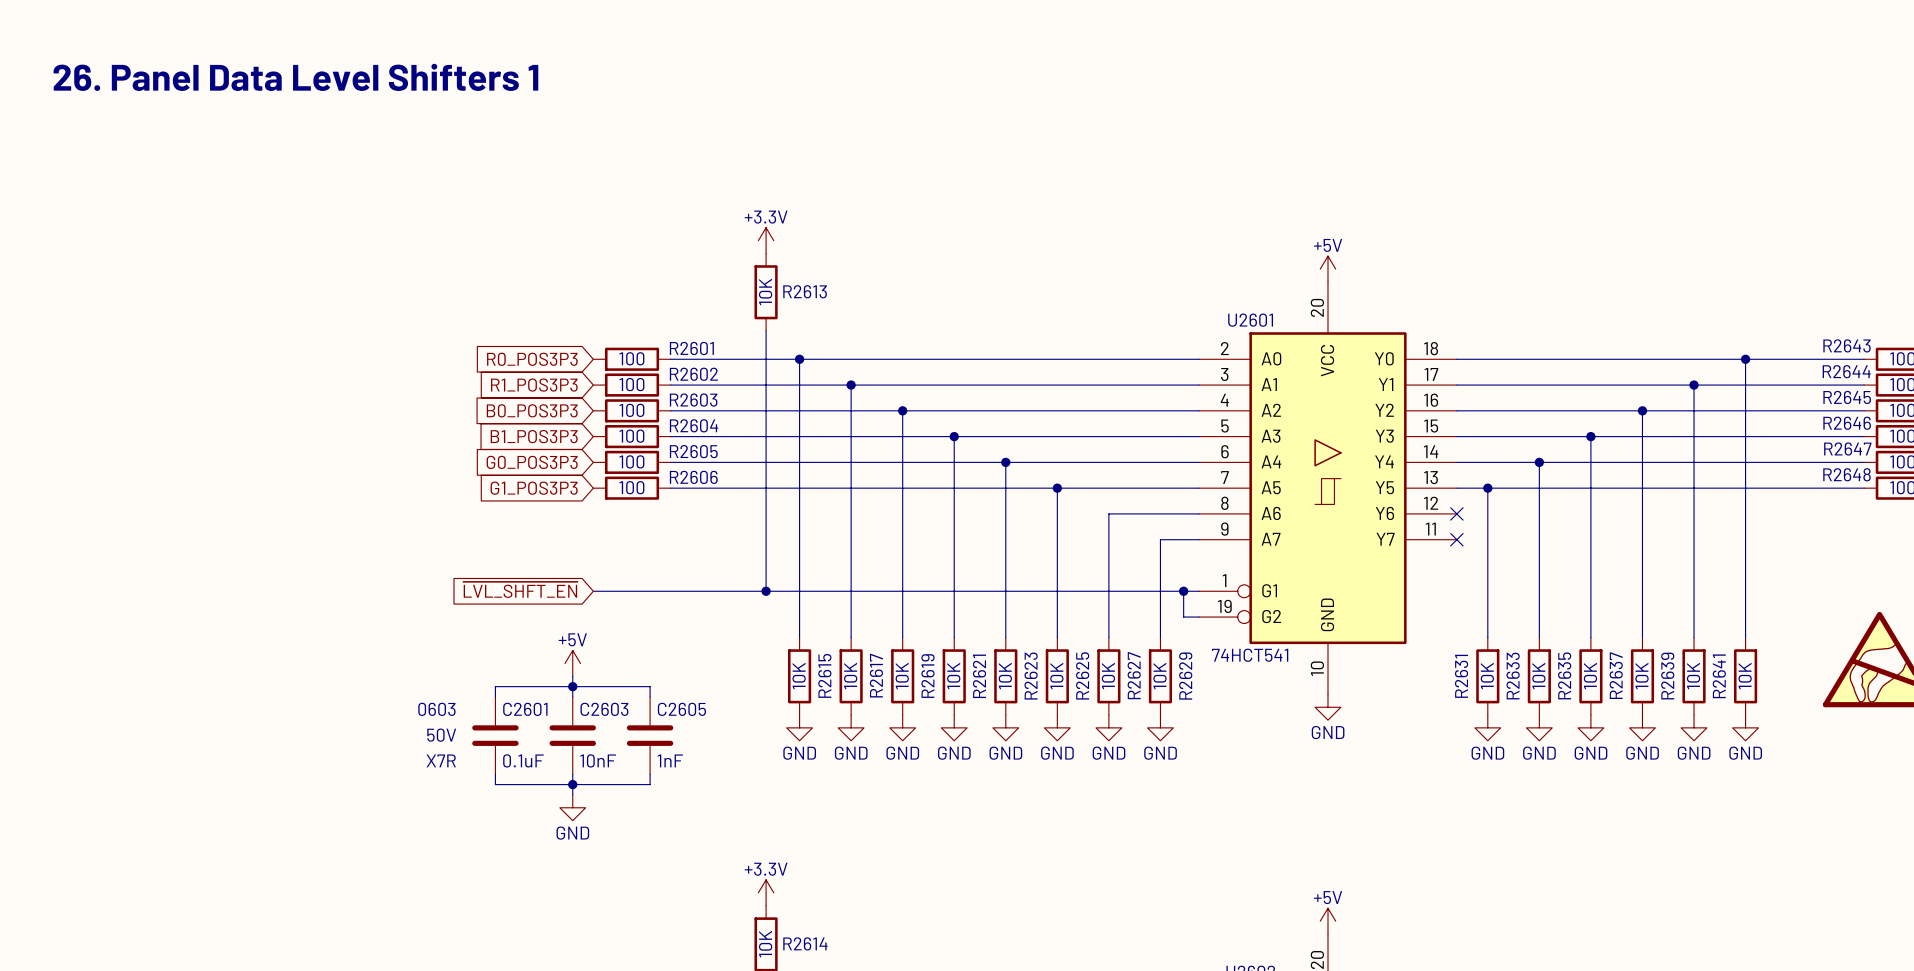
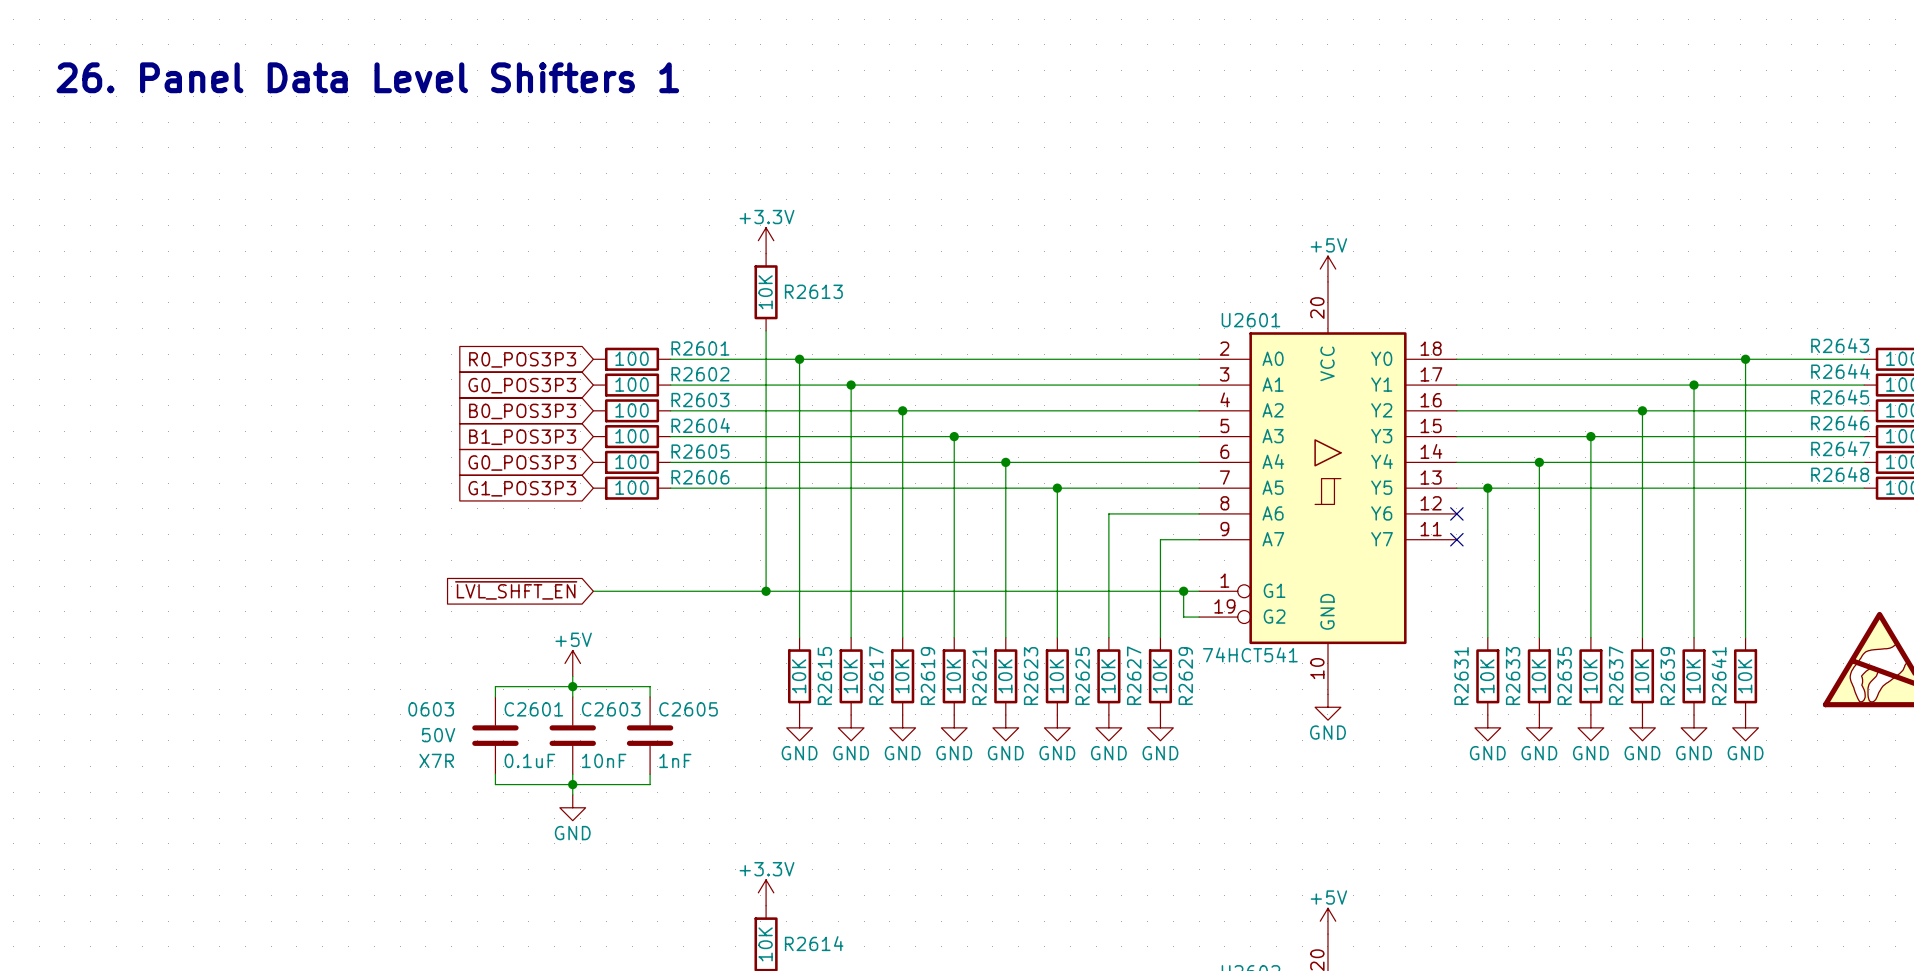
global label: R1_POS3P3 (534, 385) -> G0_POS3P3 (522, 385)

